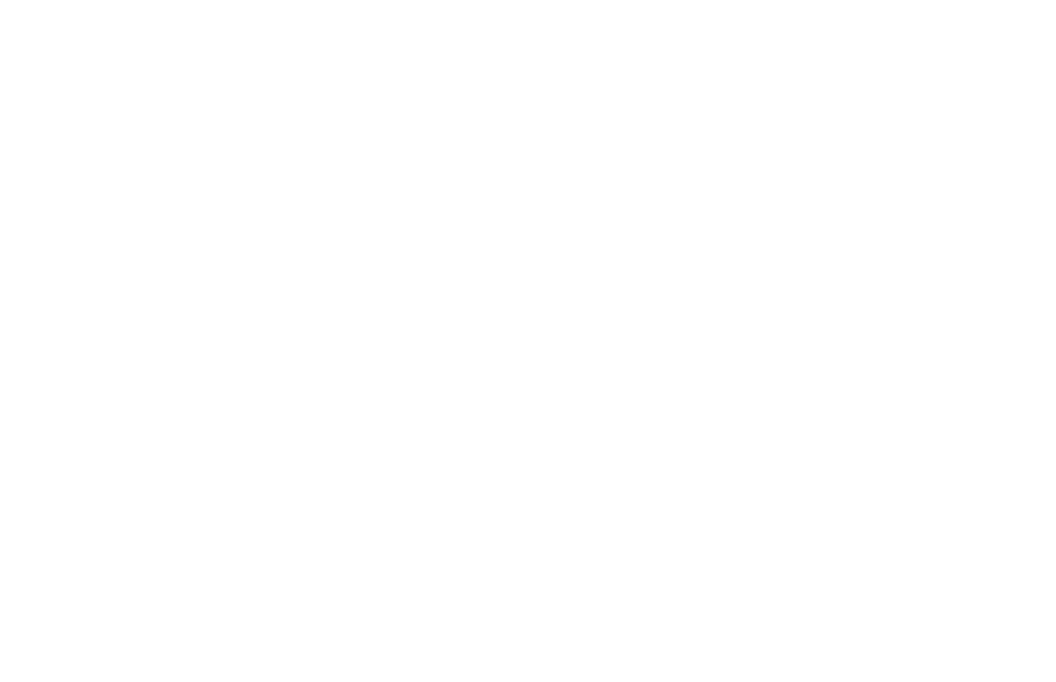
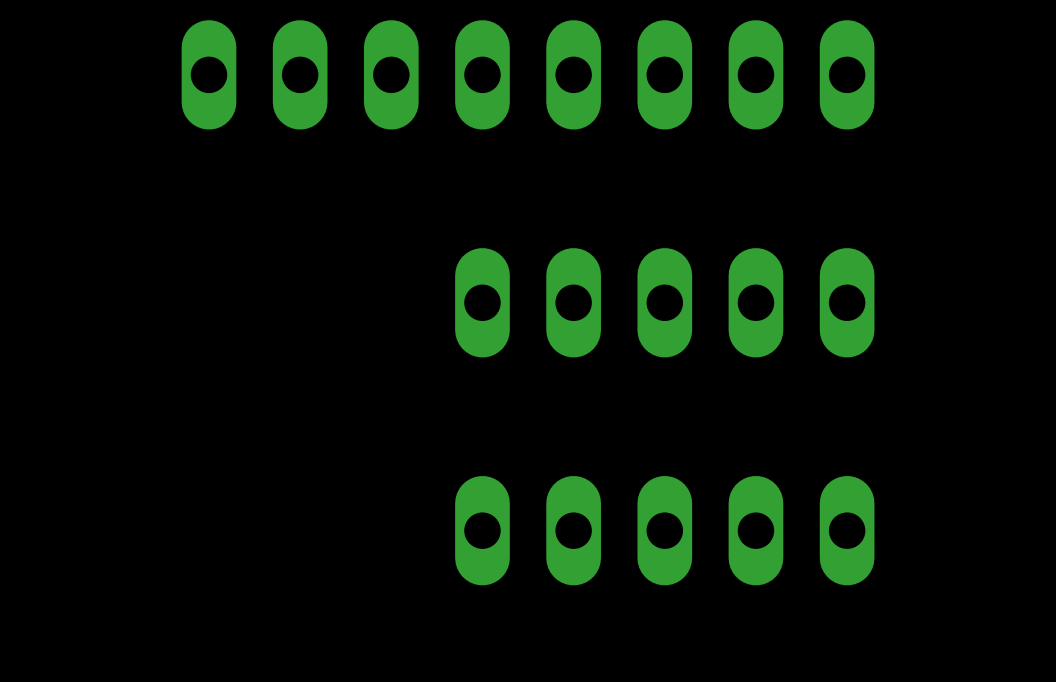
part: none -> (528, 74)
part: none -> (664, 302)
part: none -> (664, 530)

